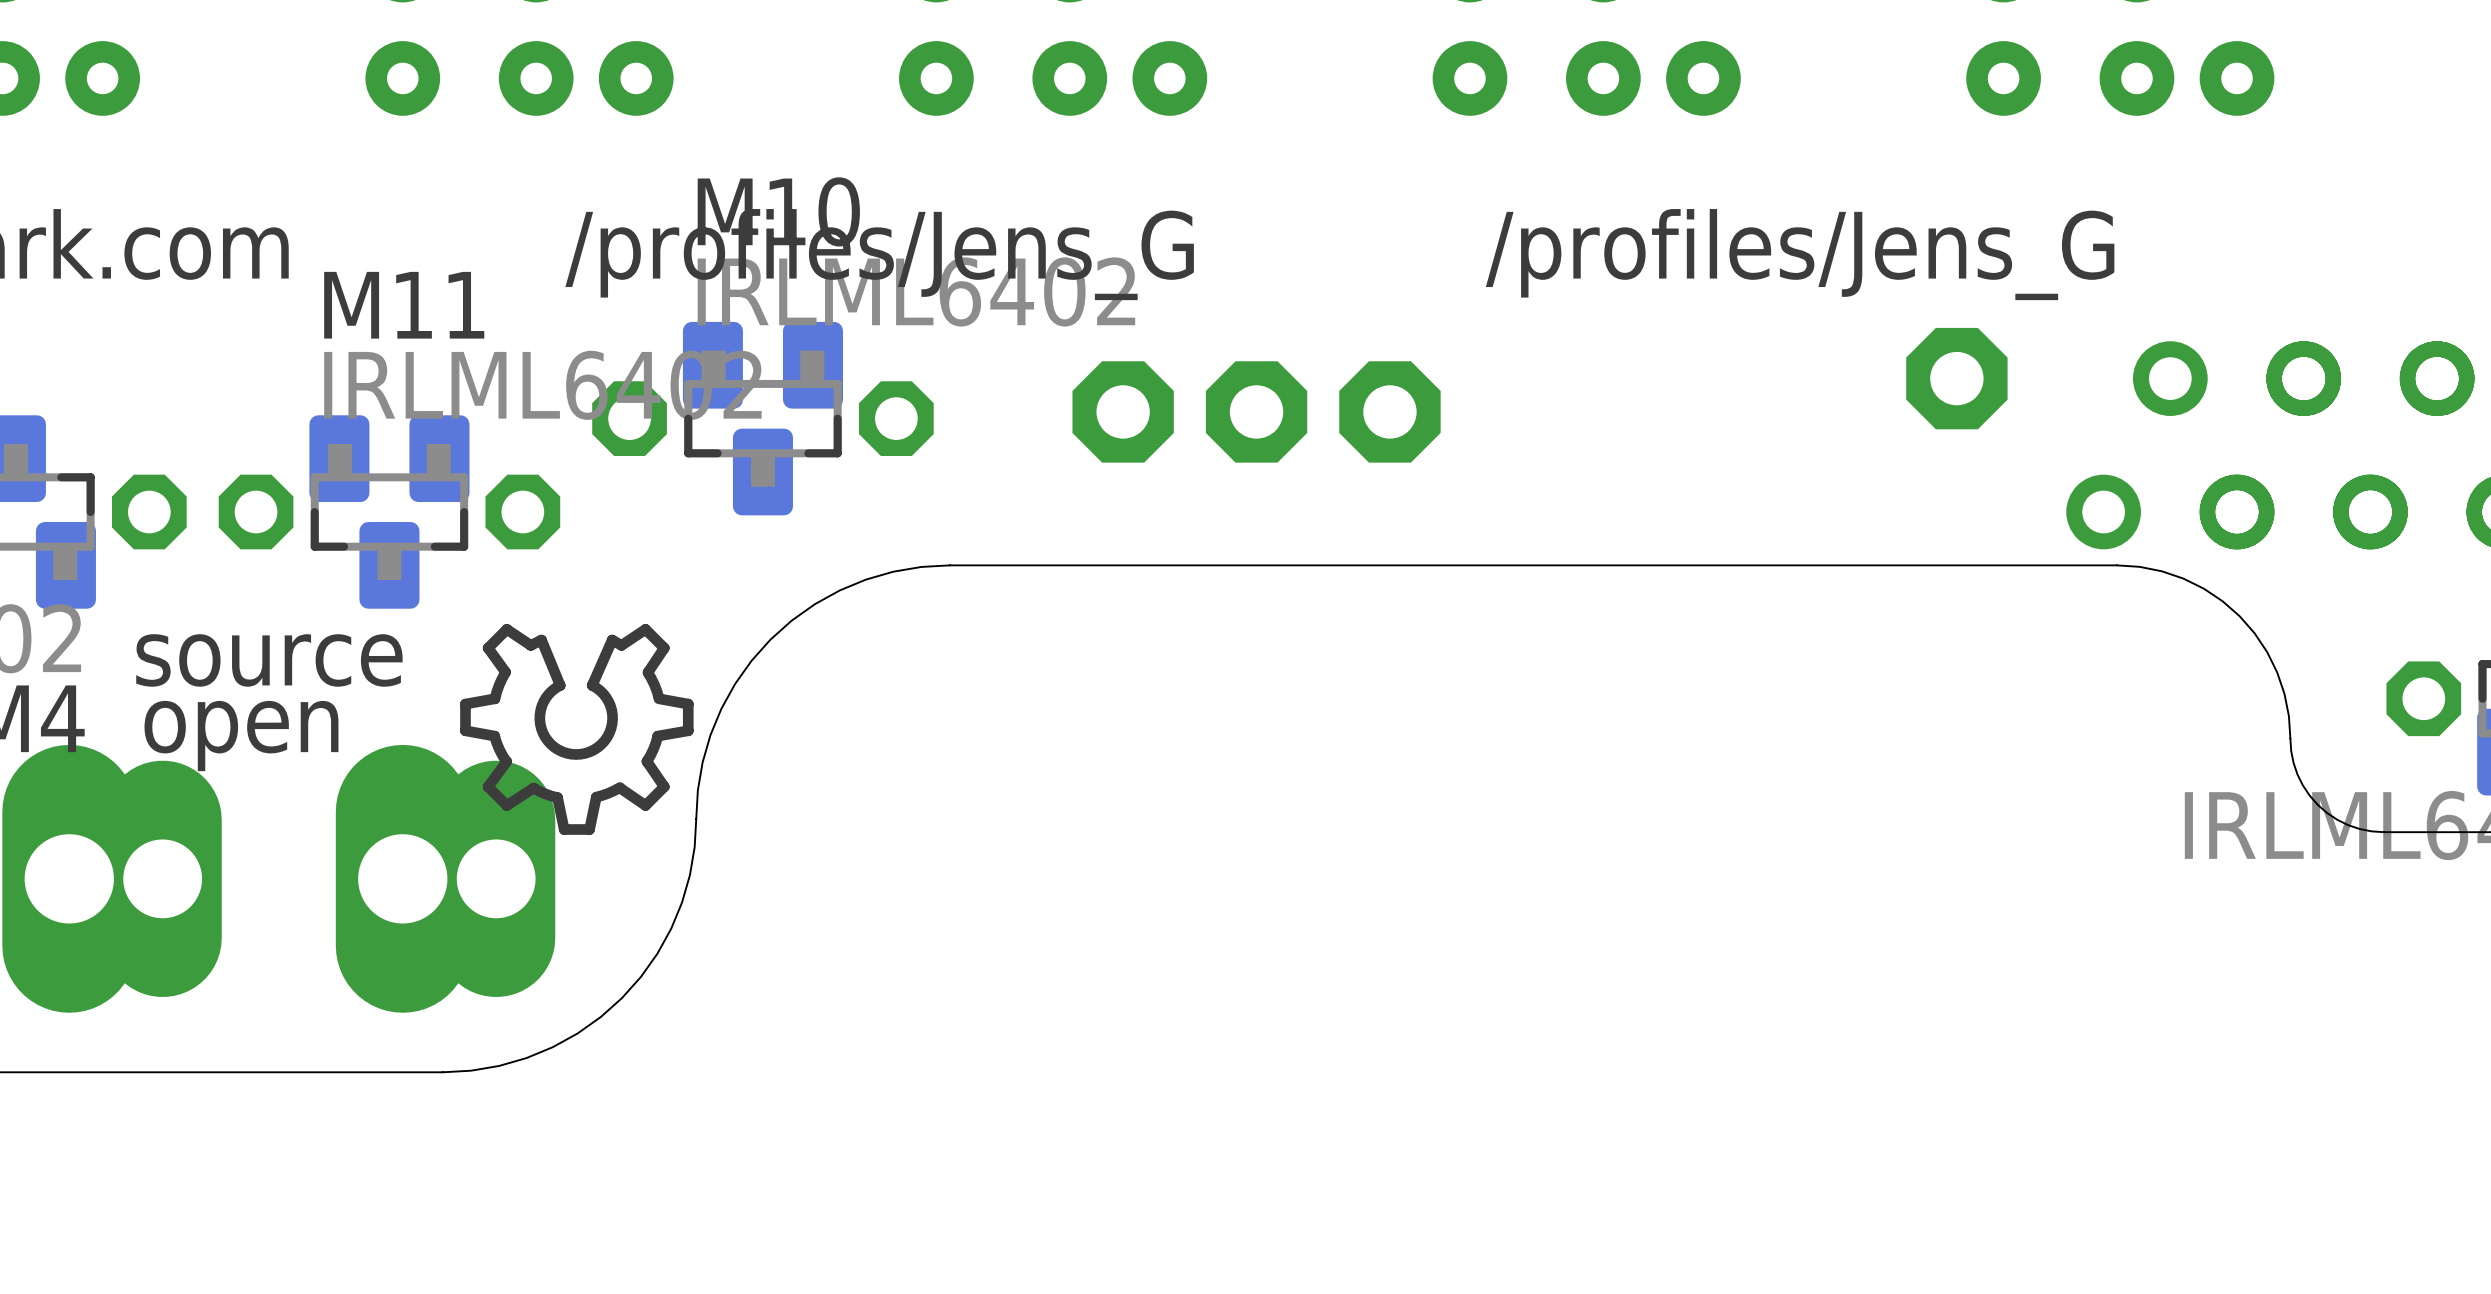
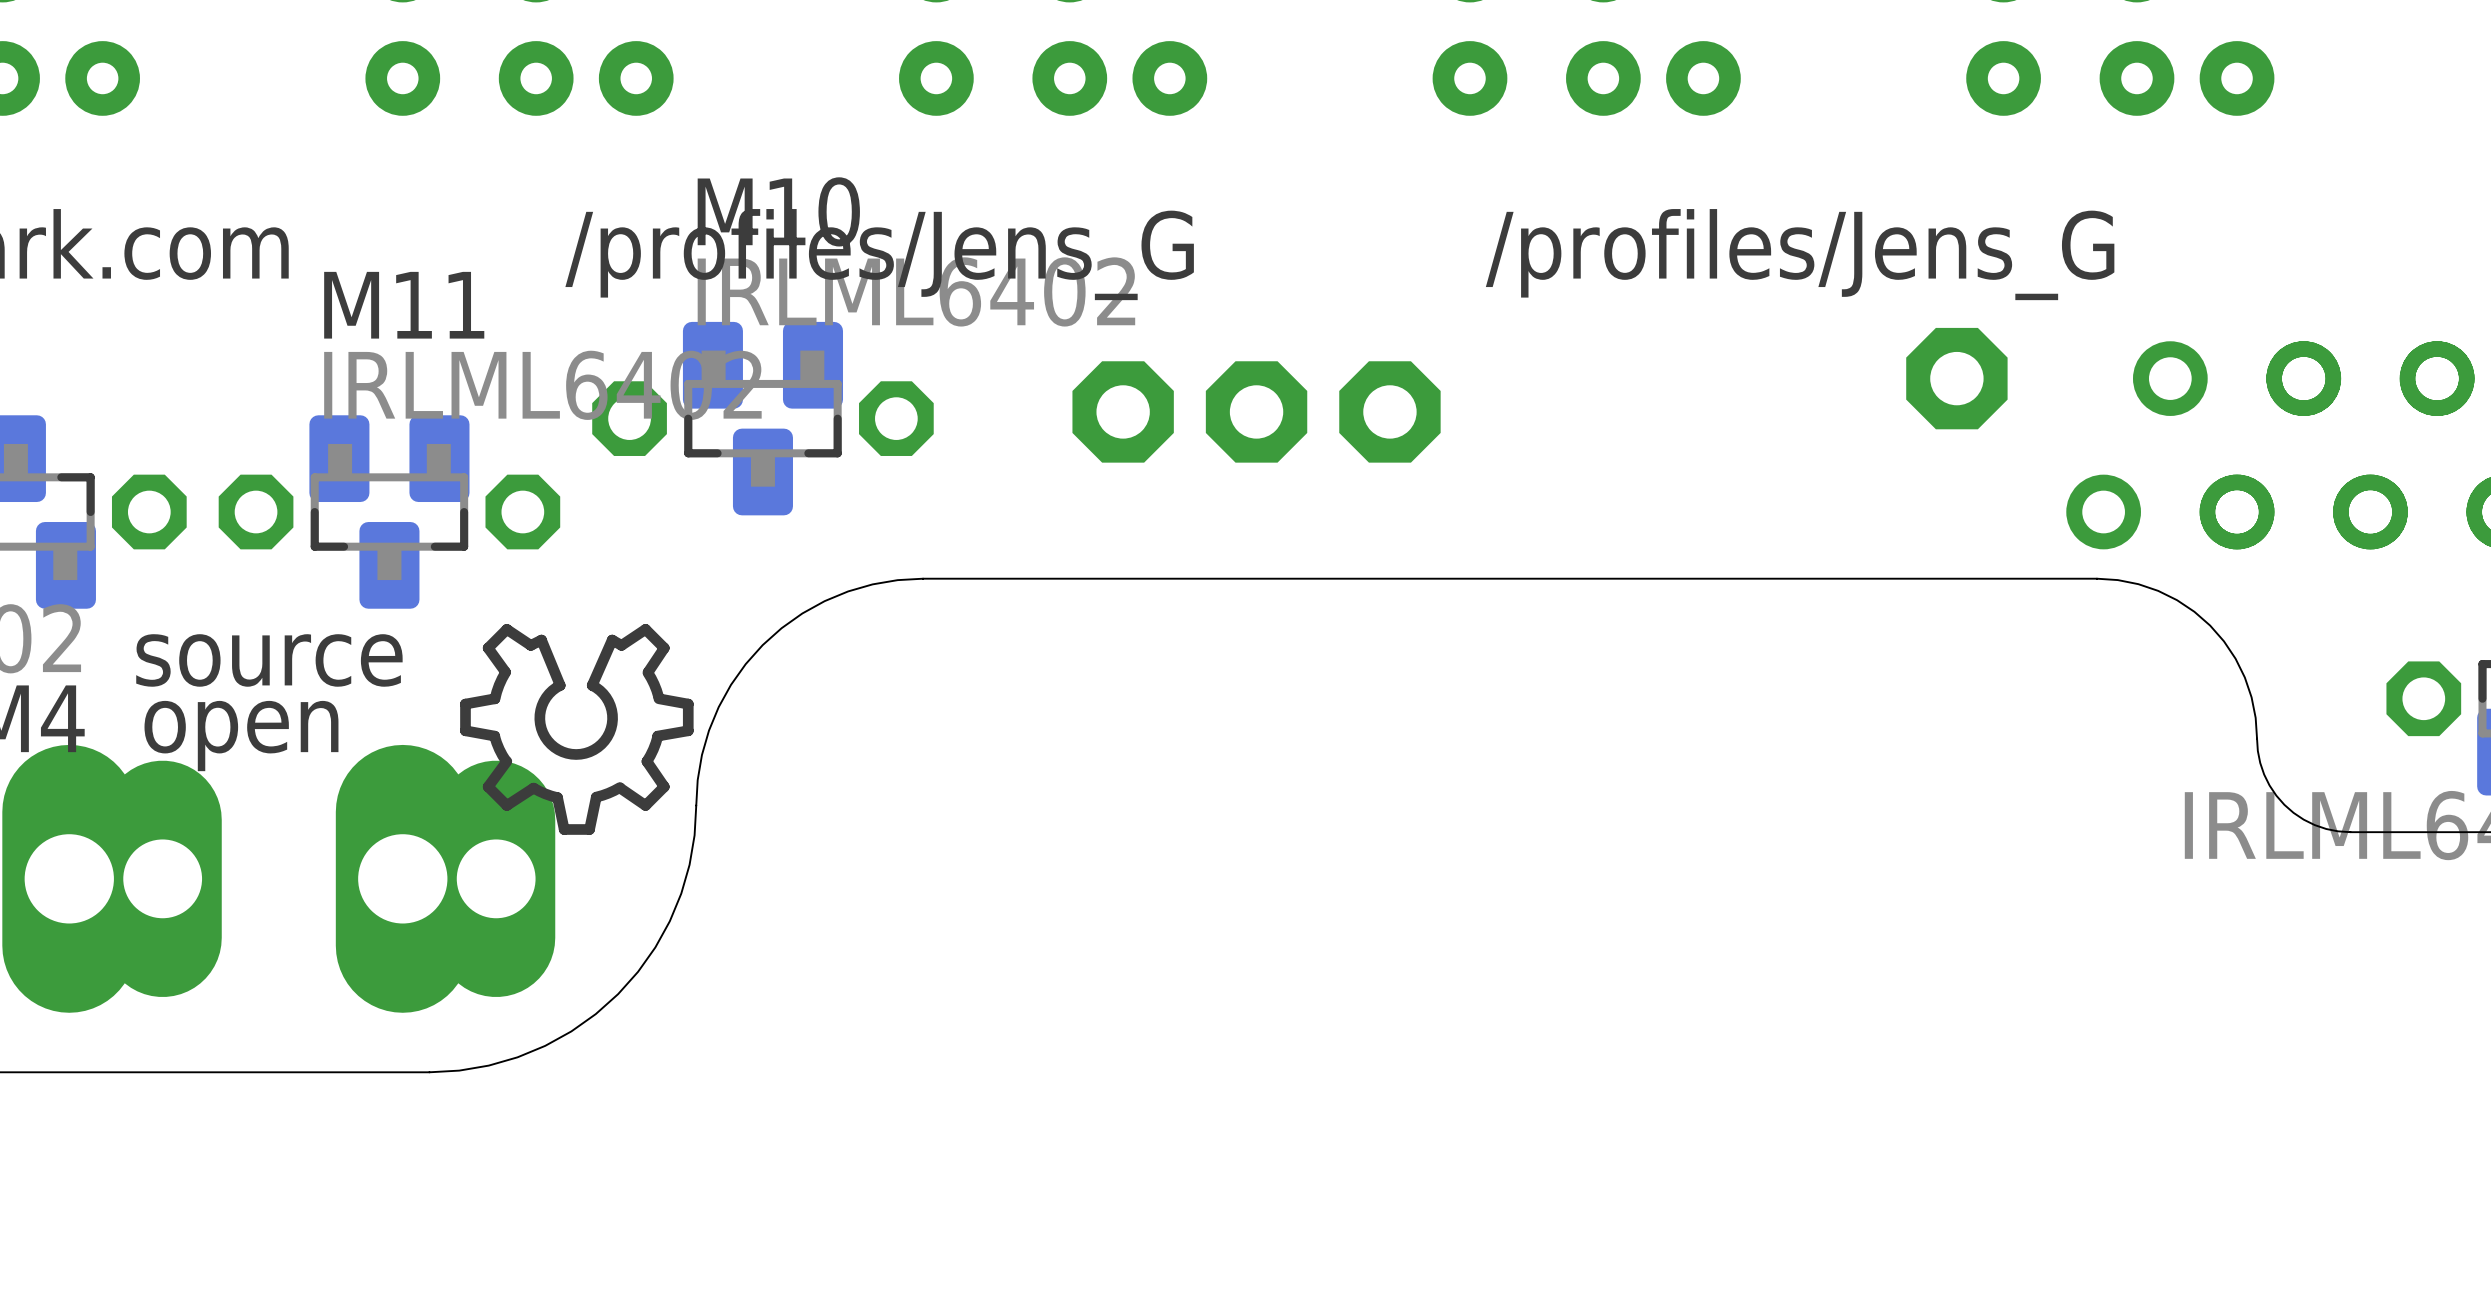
board edge: (2383, 832) (2359, 828) (2337, 819) (2317, 804) (2302, 785) (2293, 762) (2288, 716) (2277, 672) (2254, 633) (2239, 616) (2222, 601) (2183, 578) (2139, 566) (949, 565) (921, 566) (893, 571) (866, 579) (839, 590) (814, 604) (791, 620) (770, 639) (751, 660) (735, 683) (721, 708) (710, 735) (702, 762) (697, 790) (694, 847) (689, 875) (682, 902) (671, 928) (657, 953) (640, 976) (622, 998) (600, 1016) (577, 1033) (552, 1047) (526, 1058) (499, 1065) (471, 1070) (429, 1072) -> (2383, 832) (2350, 832) (2326, 828) (2303, 819) (2284, 804) (2276, 795) (2264, 774) (2257, 750) (2255, 717) (2251, 697) (2244, 677) (2223, 641) (2210, 625) (2177, 600) (2158, 590) (2117, 580) (897, 580) (848, 591) (802, 613) (762, 645) (731, 684) (708, 730) (701, 755) (697, 780) (694, 835) (689, 864) (681, 893) (669, 921) (655, 947) (638, 971) (618, 994) (595, 1014) (571, 1031) (545, 1045) (517, 1057) (488, 1065) (459, 1070) (429, 1072)

